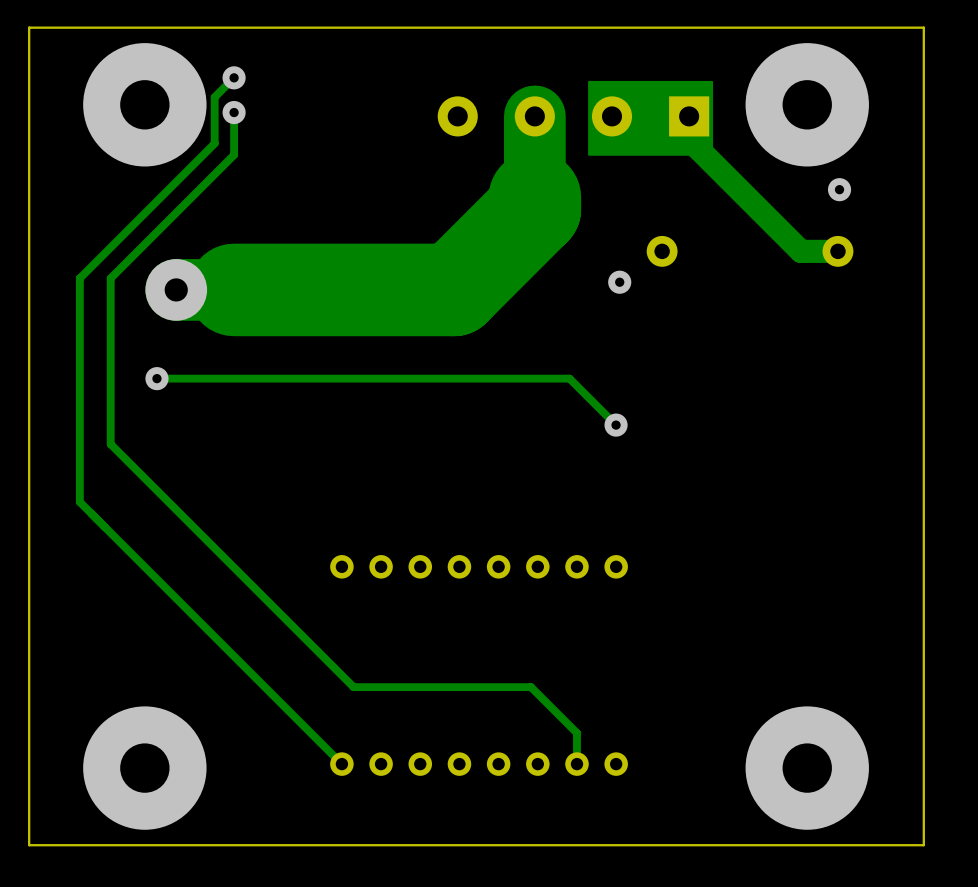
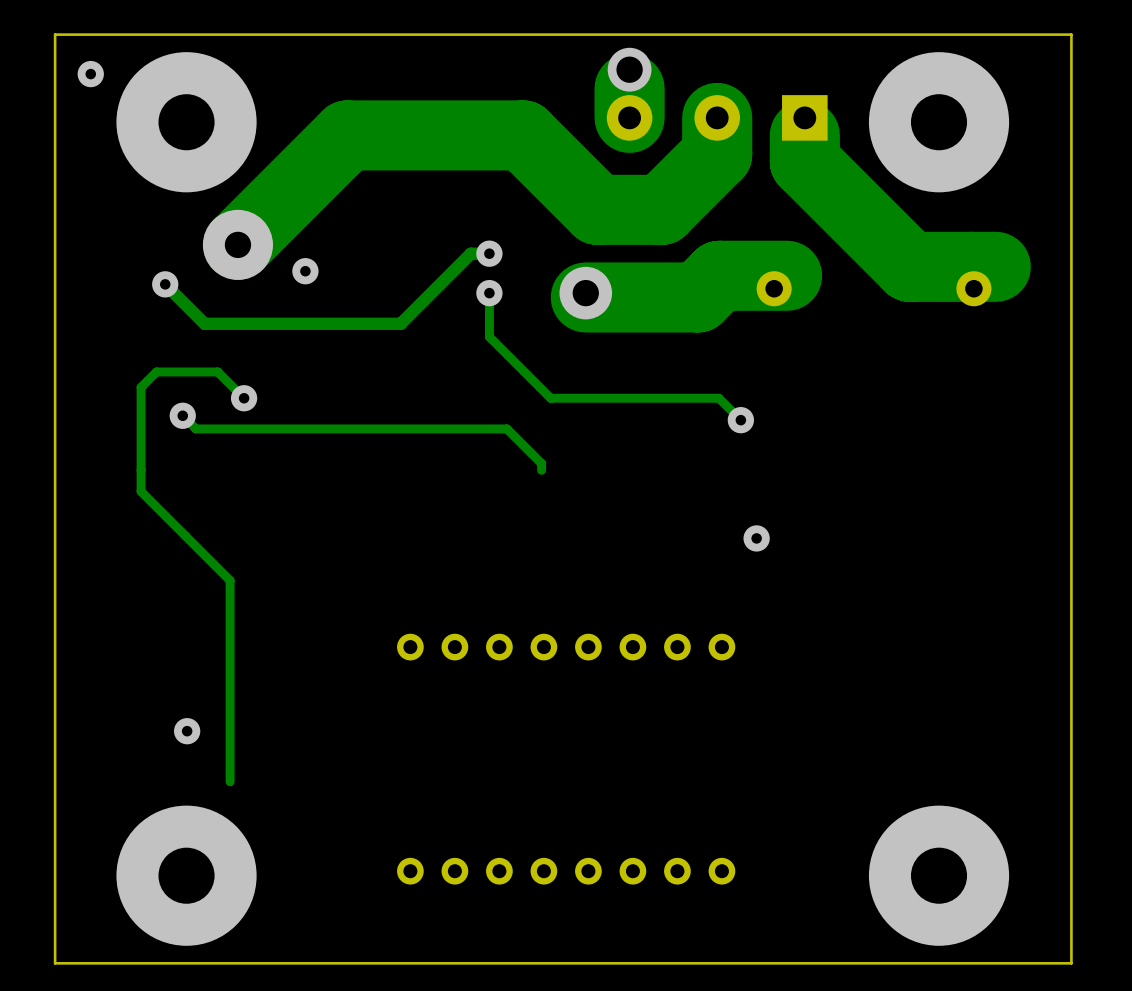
via: none -> (629, 69)
via: none -> (90, 74)
track: none -> (629, 88) (629, 117)
track: (234, 77) (214, 97) (214, 143) (79, 278) (79, 502) (341, 764) -> none
via: (234, 77) -> none
drawing: [588, 80, 714, 156] -> none
track: none -> (717, 117) (717, 154) (661, 209) (597, 209) (523, 135) (347, 135) (237, 244)
part: none -> (717, 117)
track: (234, 112) (234, 154) (110, 278) (110, 444) (353, 687) (531, 687) (576, 733) (576, 764) -> none
via: (234, 112) -> none
track: (534, 116) (534, 208) (453, 289) (176, 289) -> none
part: (573, 116) -> none
track width: thin (689, 116) (689, 139) (781, 232) -> thick (804, 135) (804, 161) (909, 266)
via: (839, 189) -> none
track: none -> (489, 253) (470, 253) (400, 323) (204, 323) (165, 284)
via: none -> (489, 253)
track: (781, 232) (800, 251) (837, 251) -> (909, 266) (995, 266)
via: none -> (305, 271)
track: none -> (787, 275) (719, 275) (697, 297) (585, 297)
via: none -> (165, 284)
track: none -> (489, 293) (489, 336) (550, 398) (718, 398) (740, 420)
via: none -> (489, 293)
via: none -> (585, 293)
via: (619, 282) -> none
via position: (176, 289) -> (237, 244)
track: none -> (244, 398) (217, 371) (156, 371) (141, 387) (141, 491) (230, 580) (230, 781)
via: none -> (244, 398)
track: none -> (182, 415) (195, 428) (506, 428) (541, 463) (541, 470)
via: none -> (740, 420)
track: (156, 378) (569, 378) (616, 425) -> none
via position: (156, 378) -> (182, 415)
via: (616, 425) -> none
via: none -> (756, 538)
via: none -> (187, 731)

